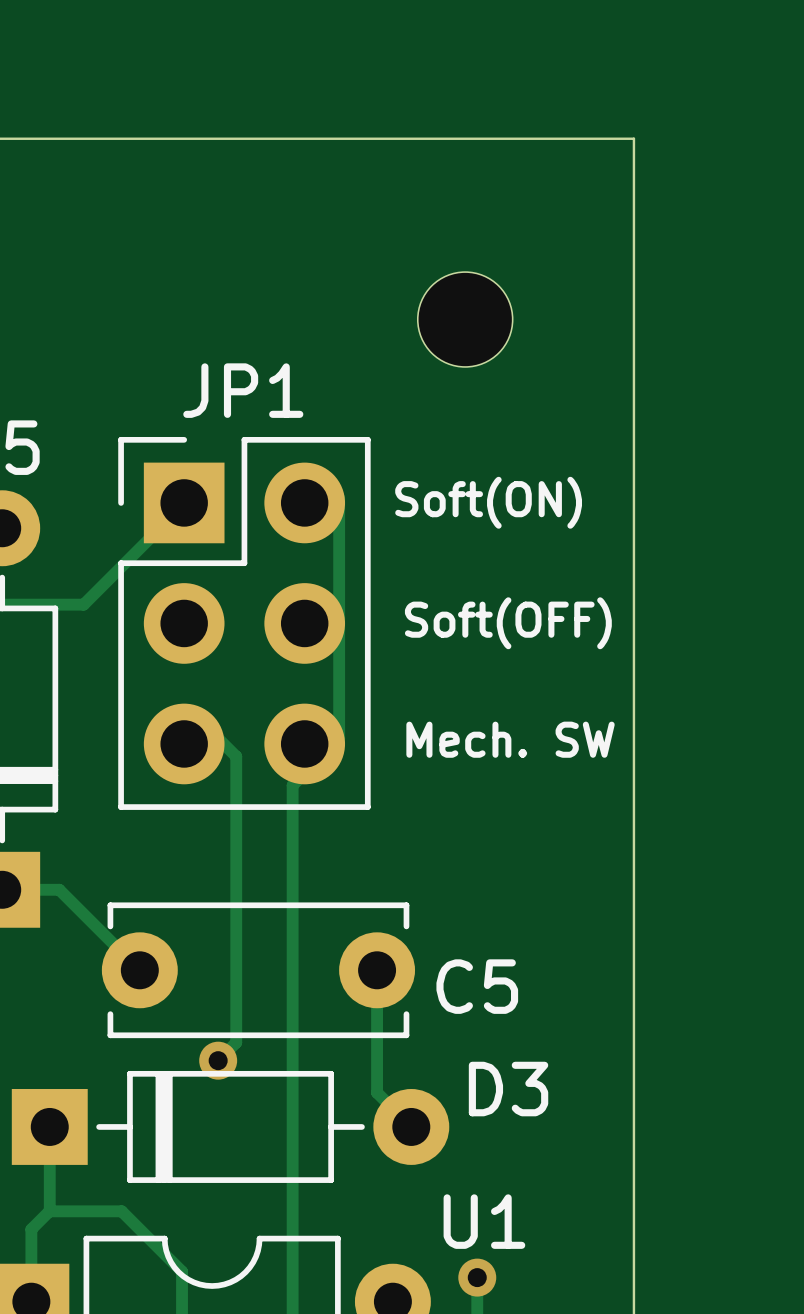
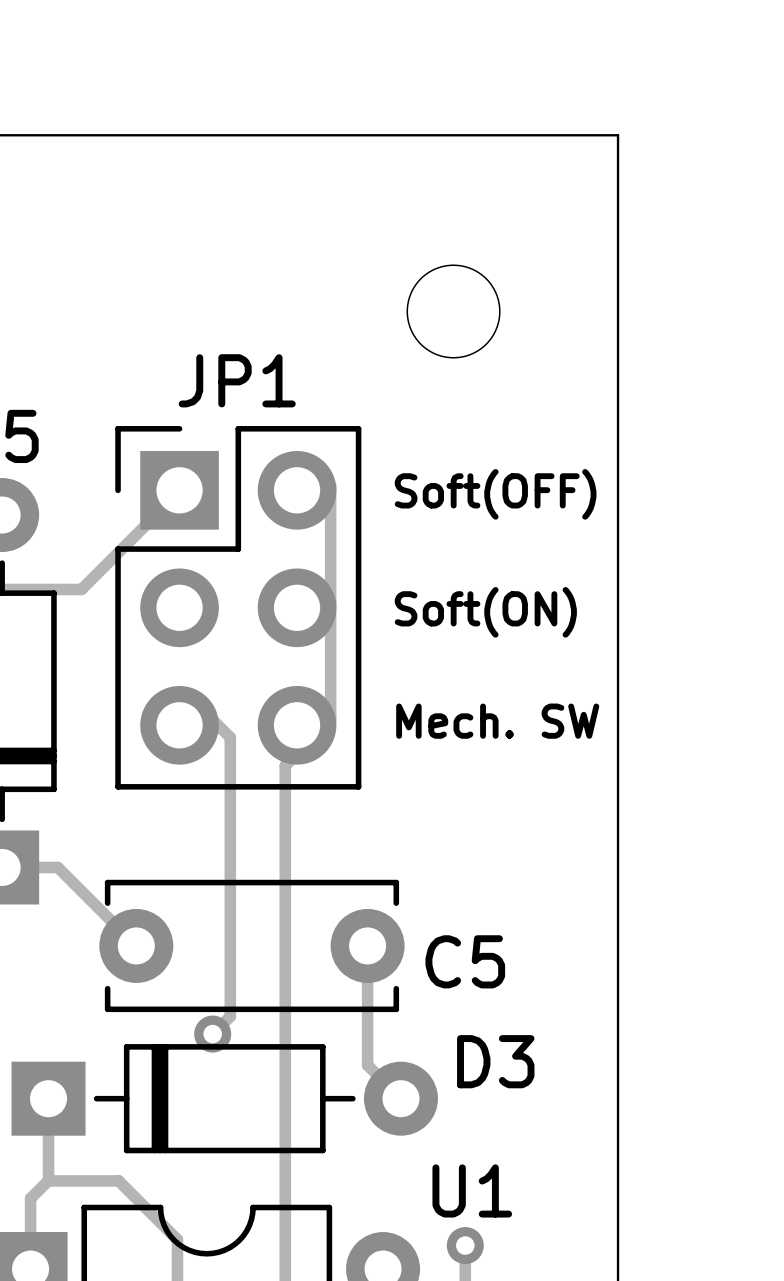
text: Soft(ON) (488, 502) -> Soft(OFF) (495, 494)
text: Soft(OFF) (508, 623) -> Soft(ON) (485, 612)

